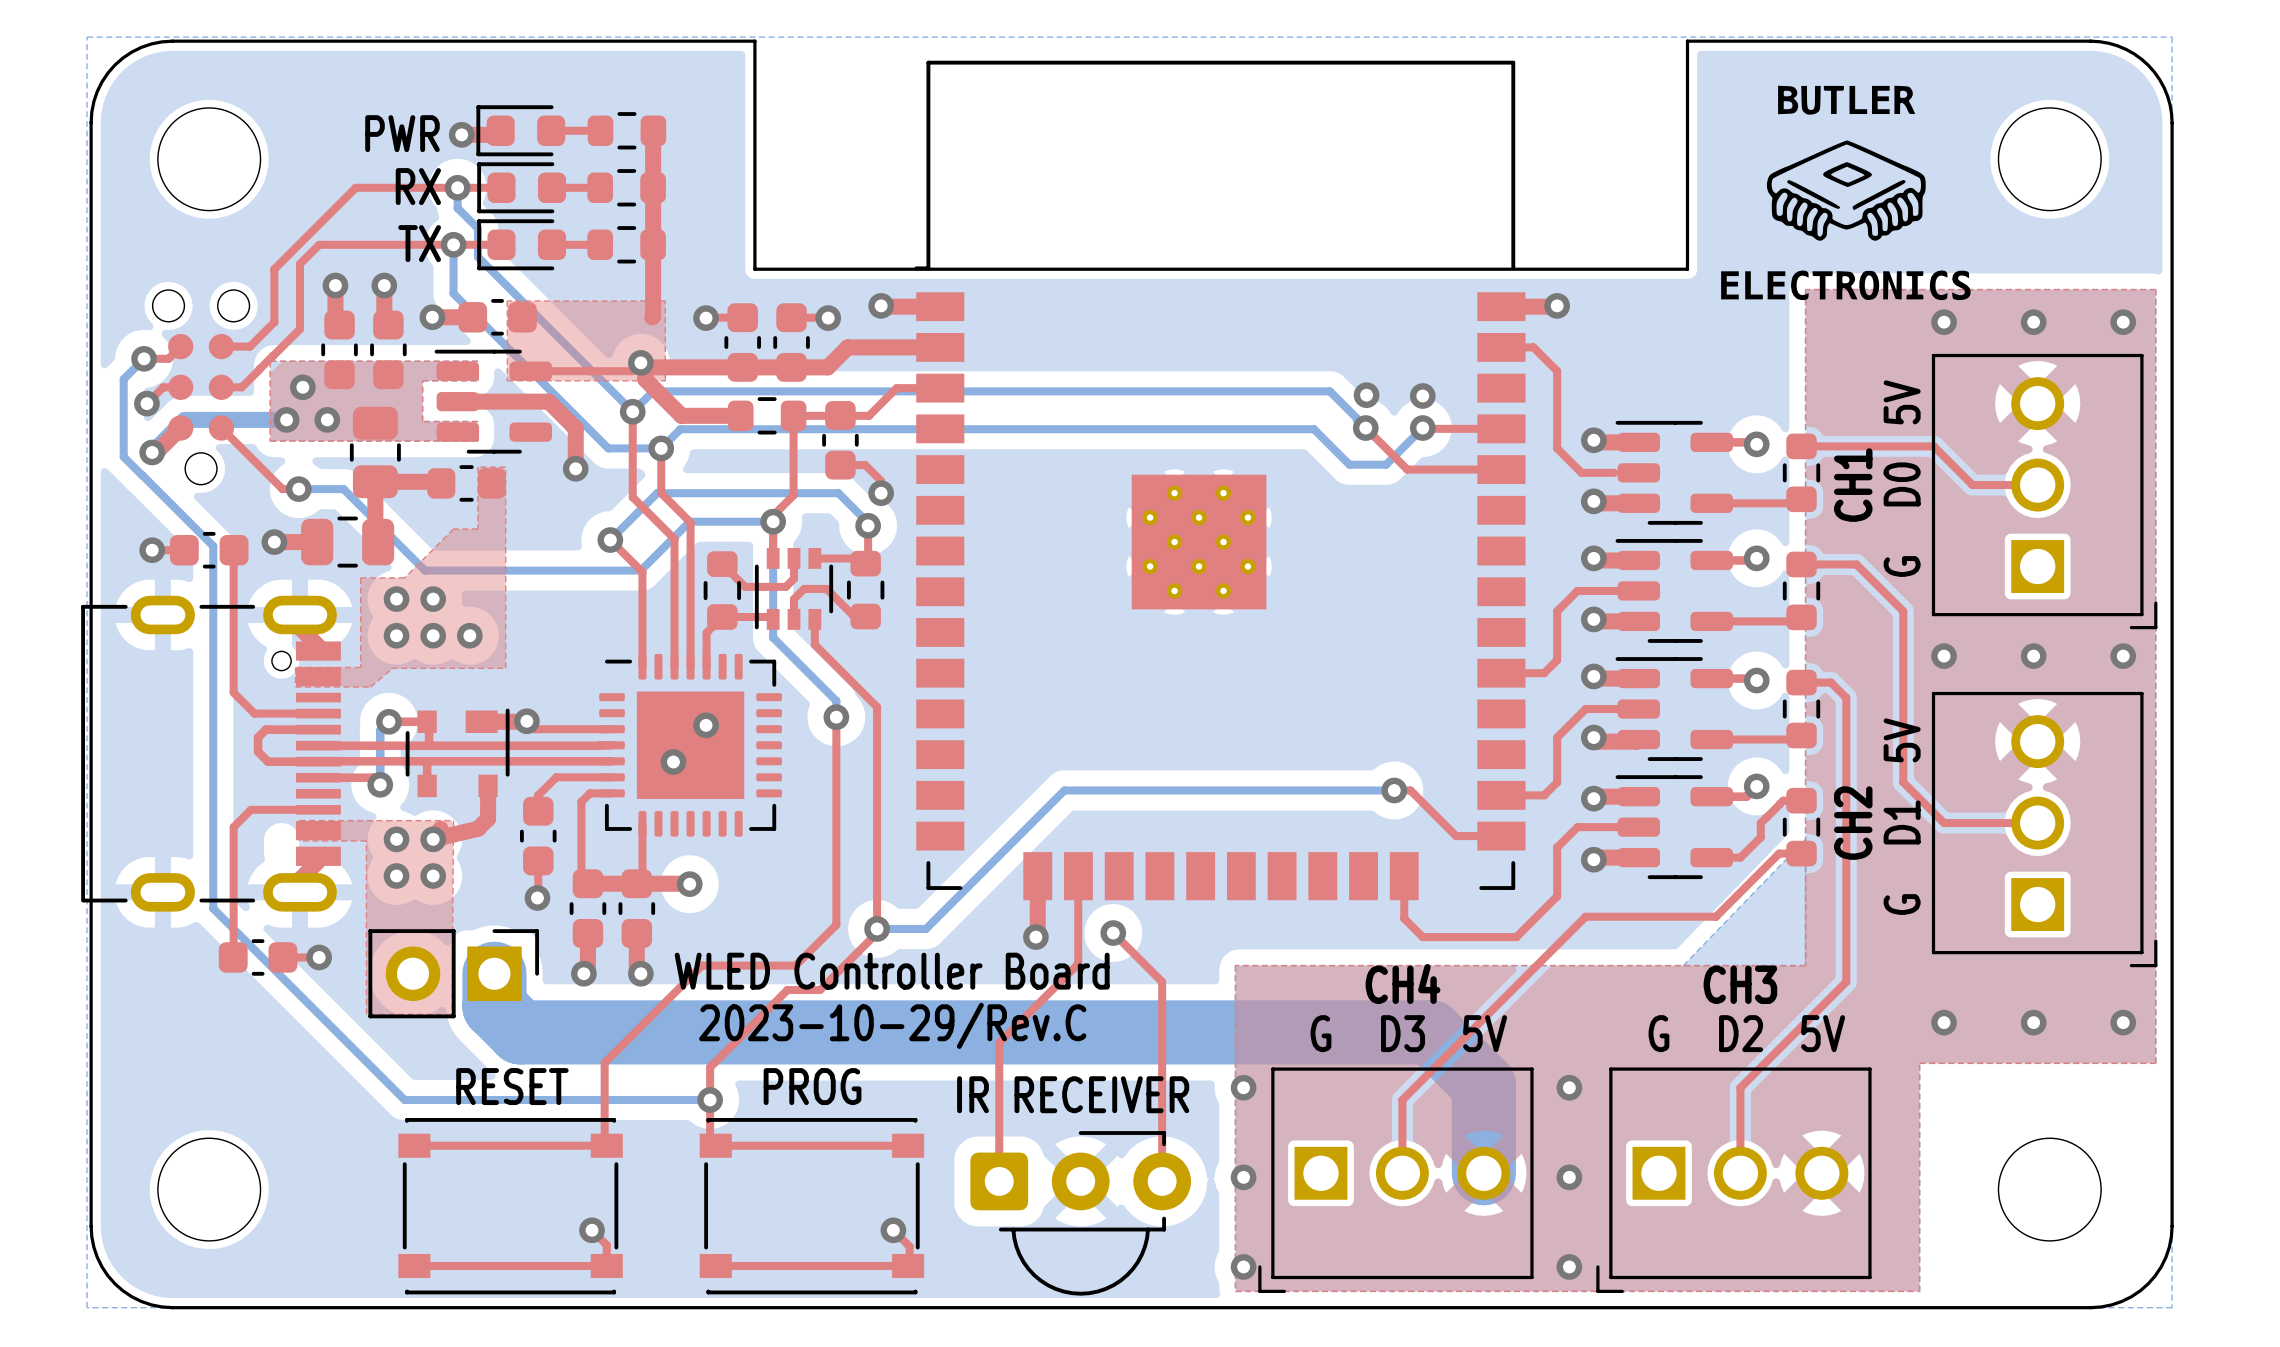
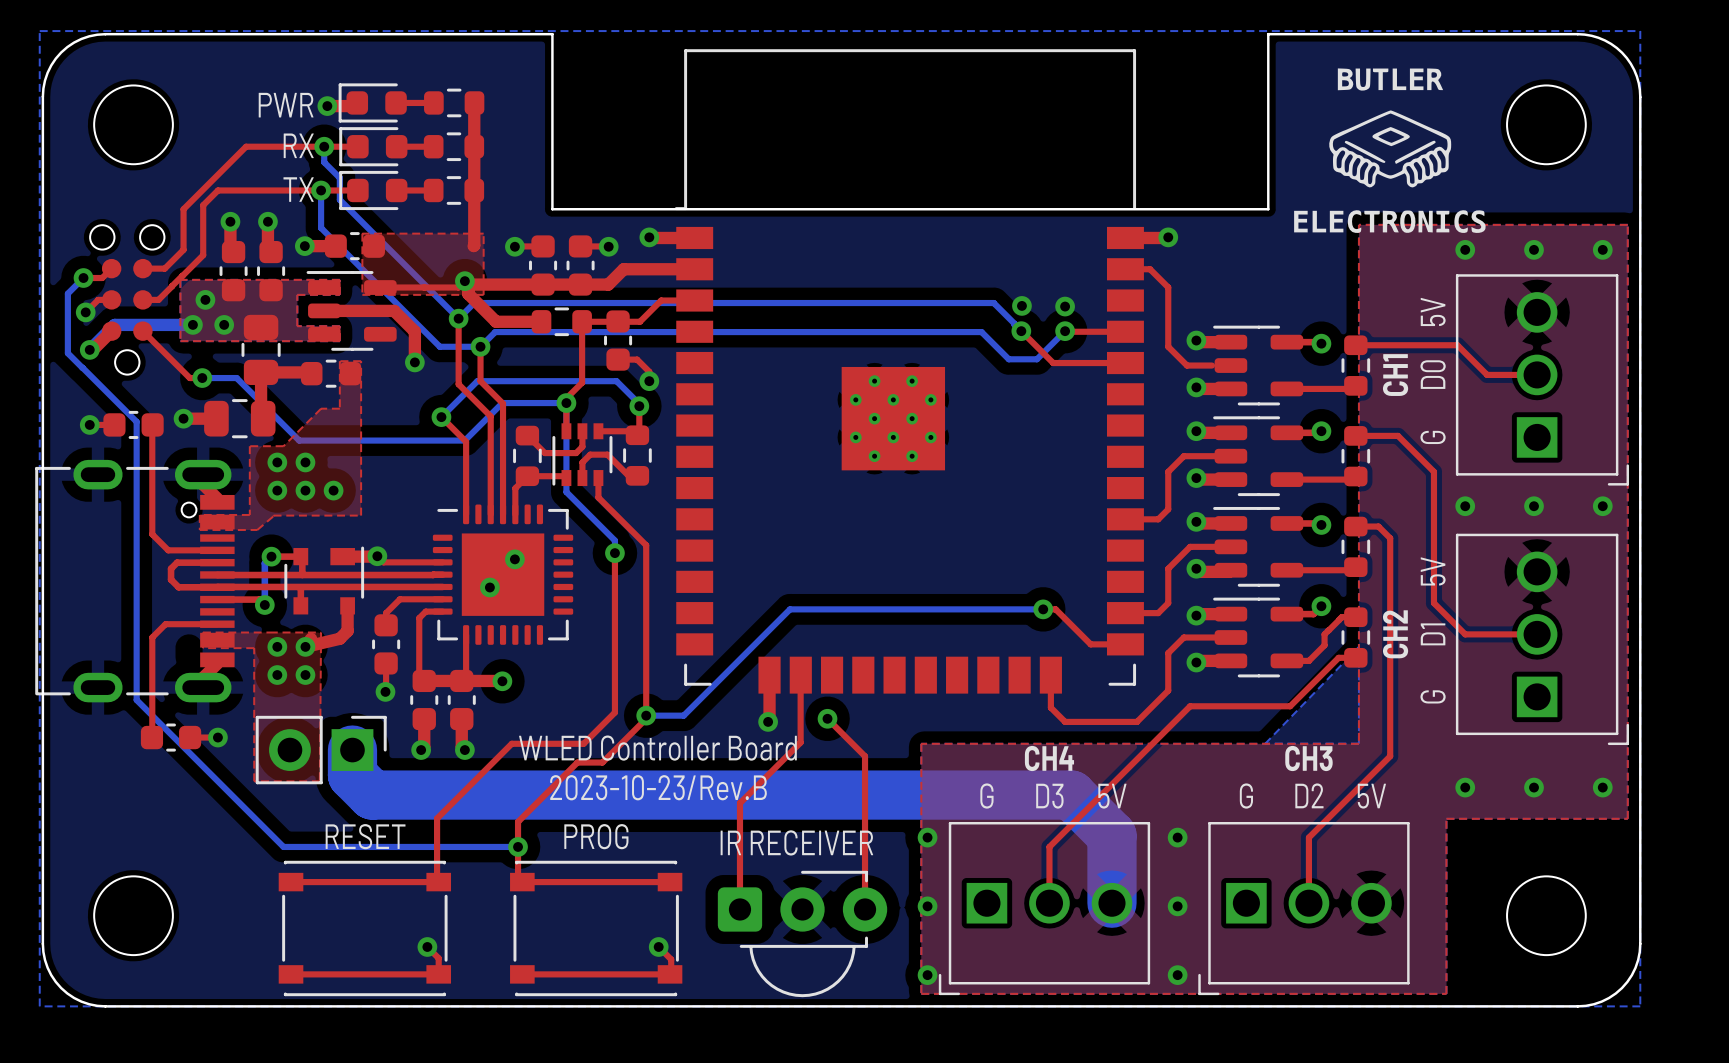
text: 2023-10-29/Rev.C (892, 1025) -> 2023-10-23/Rev.B (658, 787)

